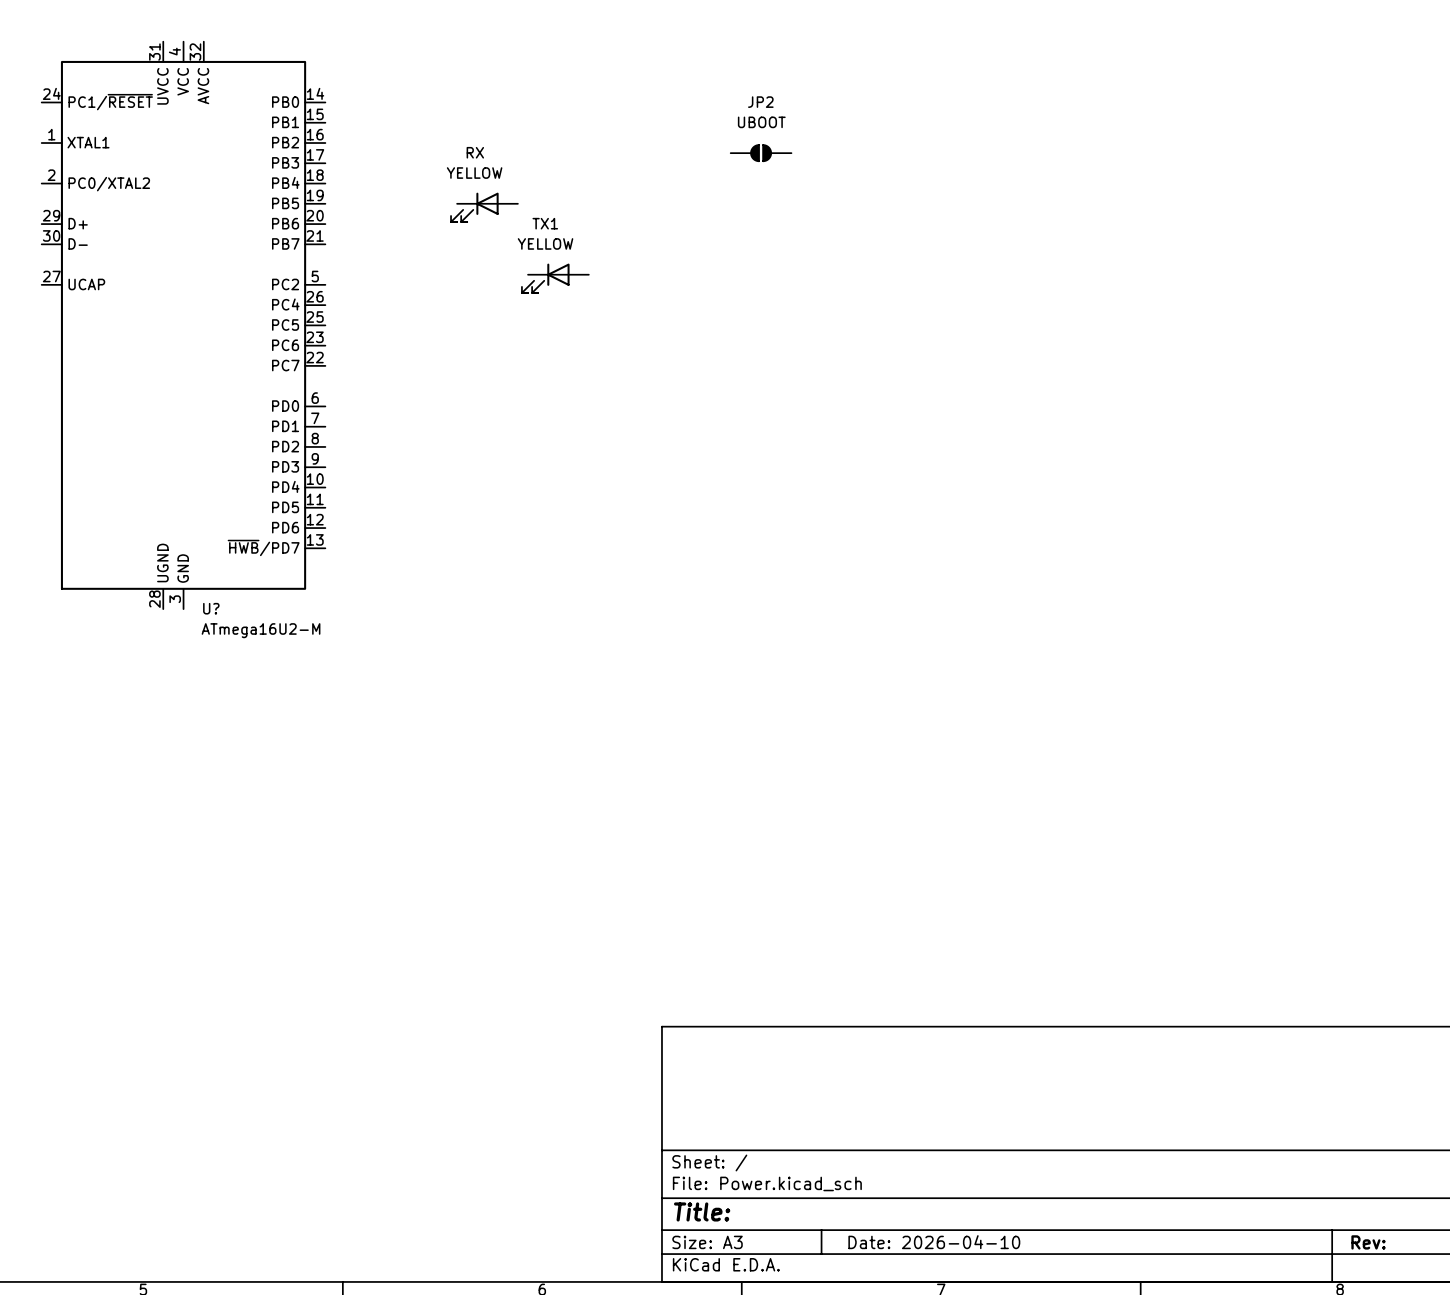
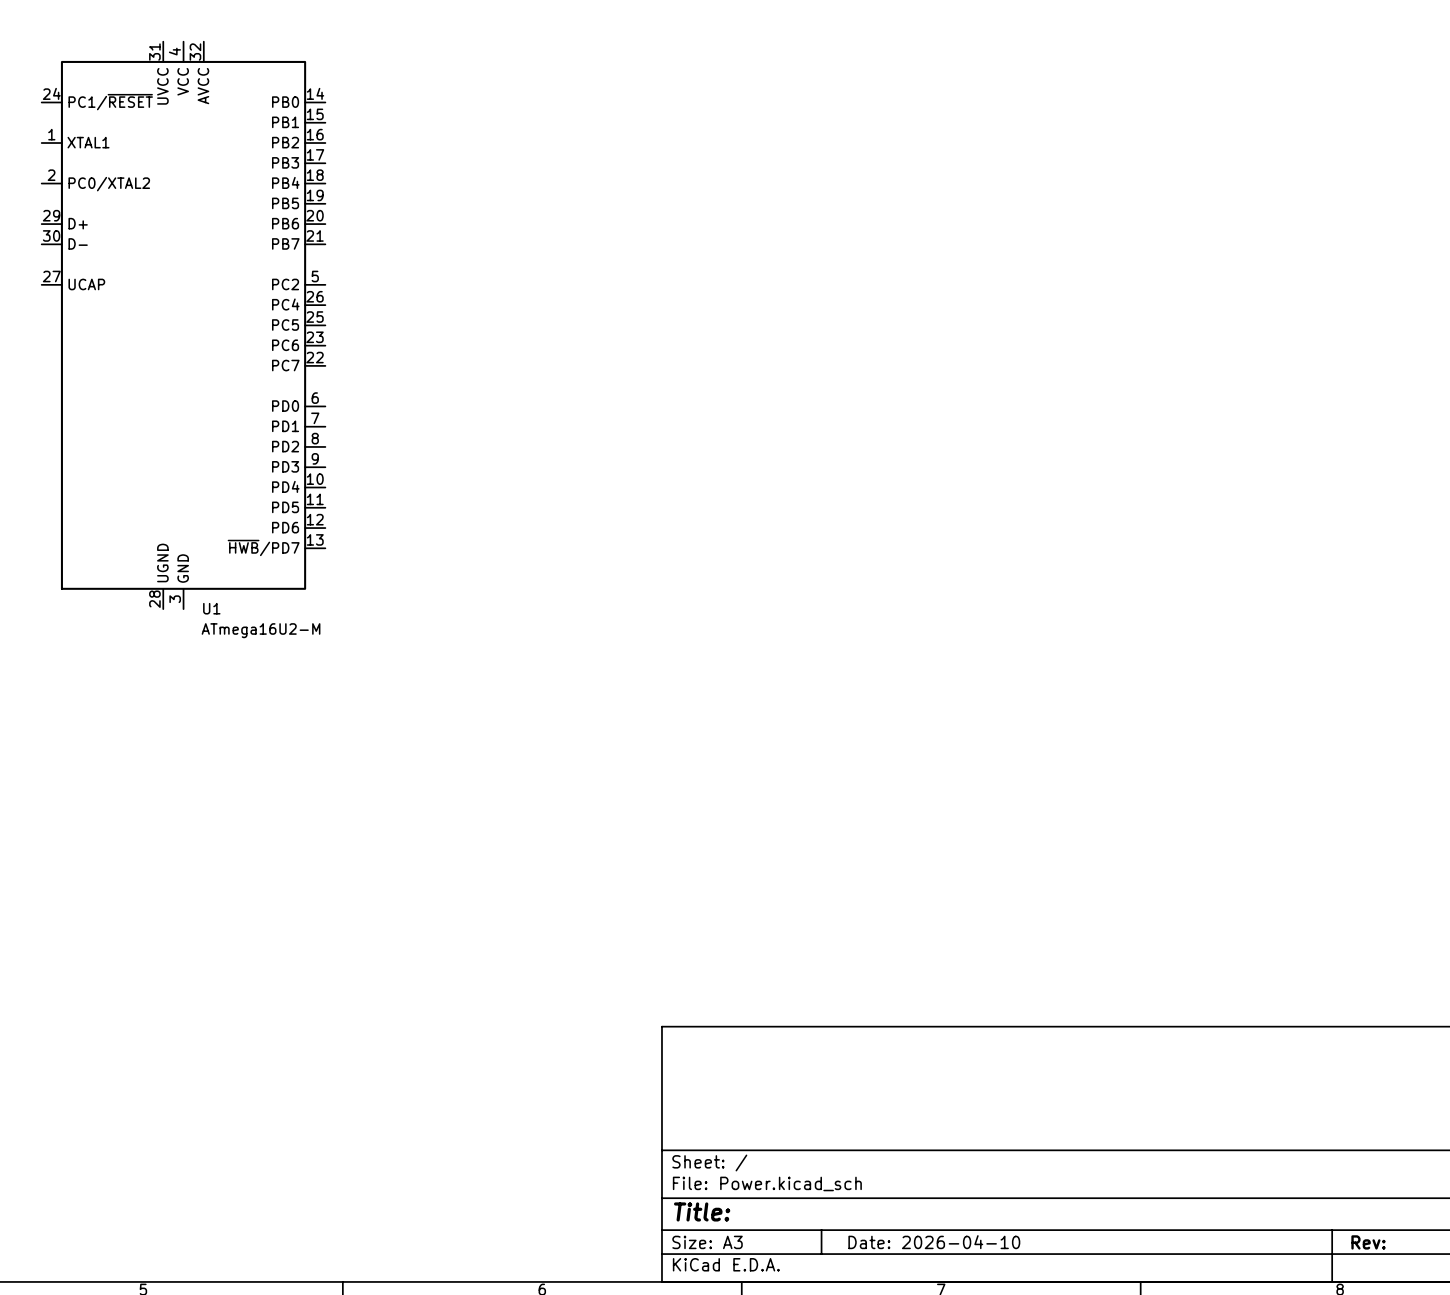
JP2: UBOOT (761, 153) -> none
RX: YELLOW (484, 207) -> none
TX1: YELLOW (555, 278) -> none
U? name: U? (211, 608) -> U1 (211, 608)

